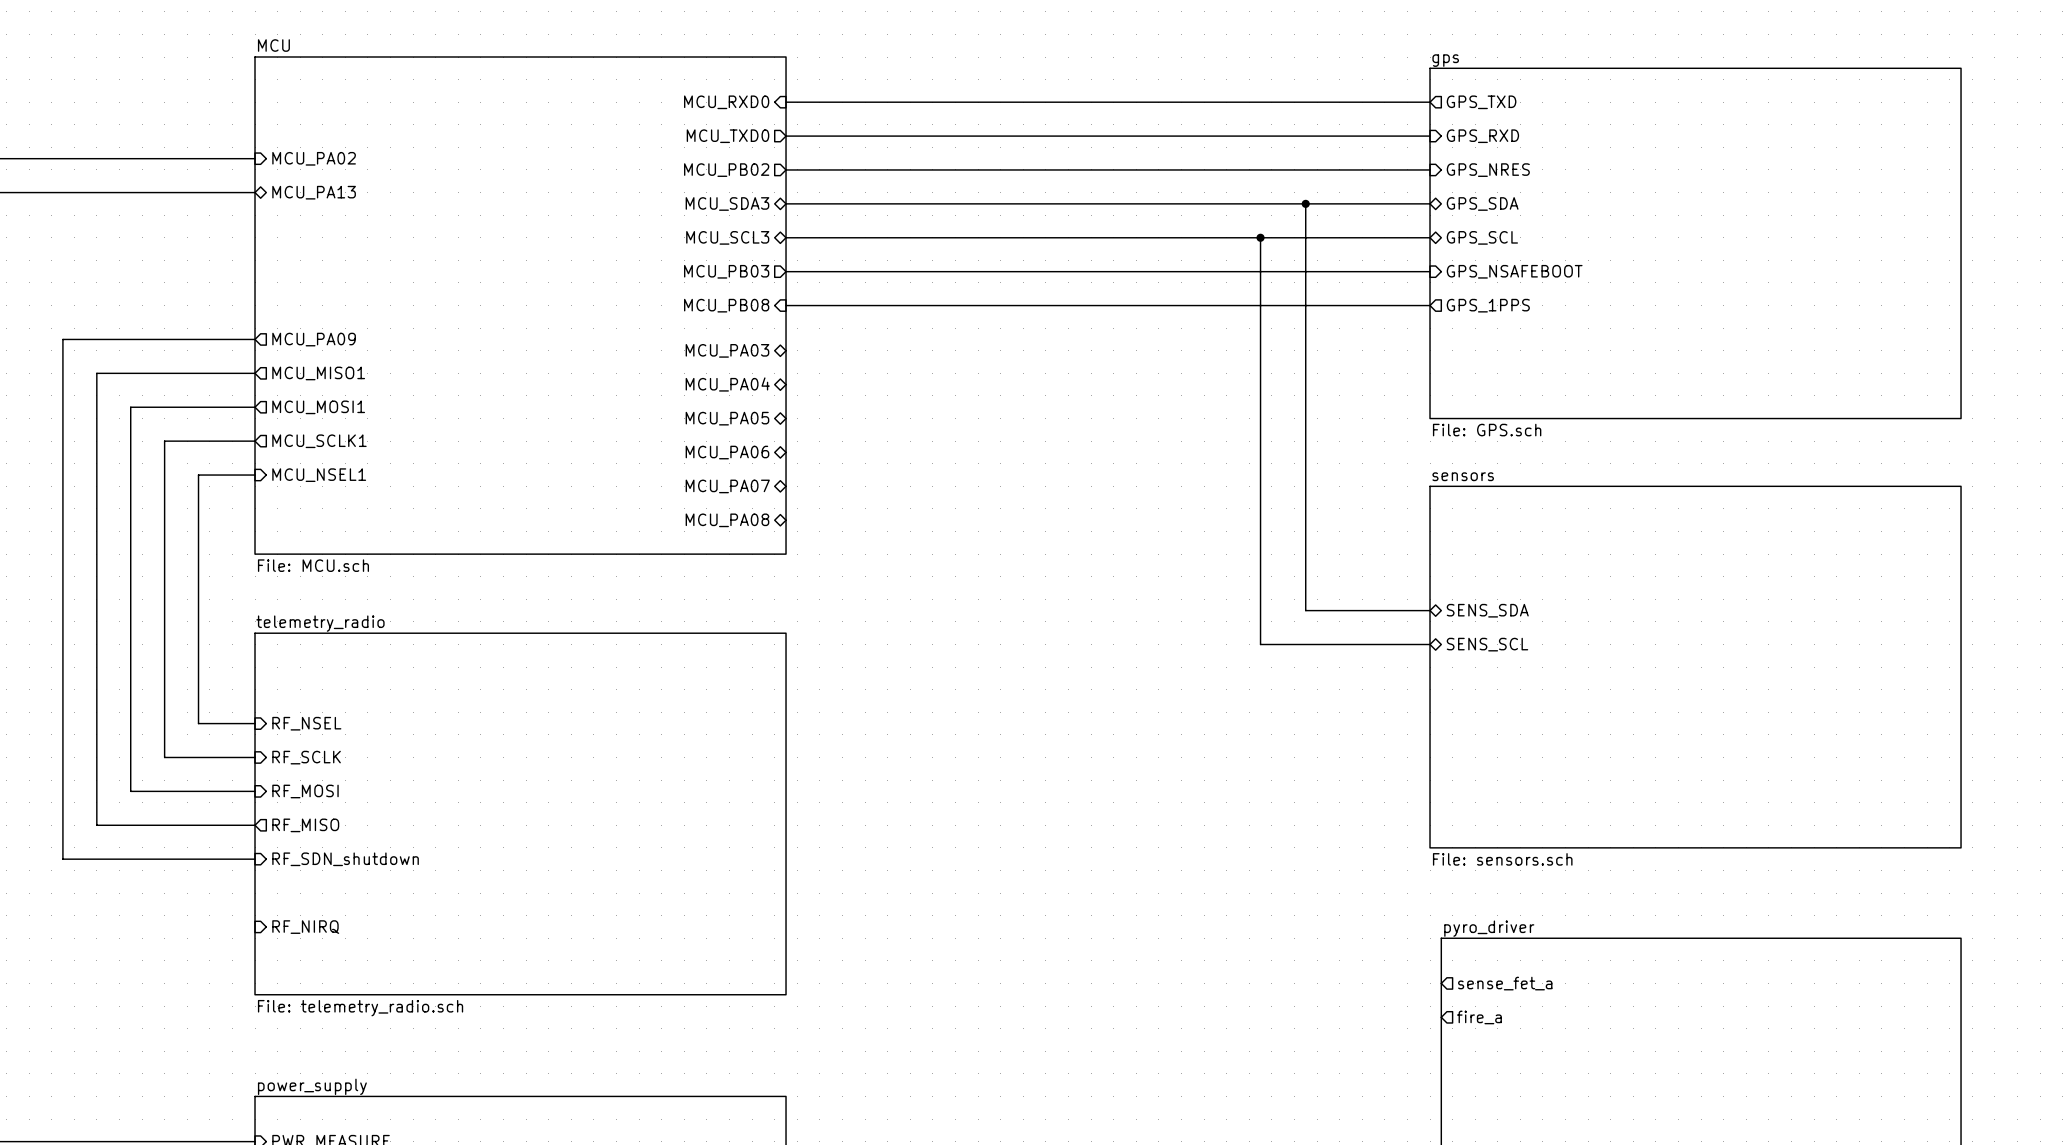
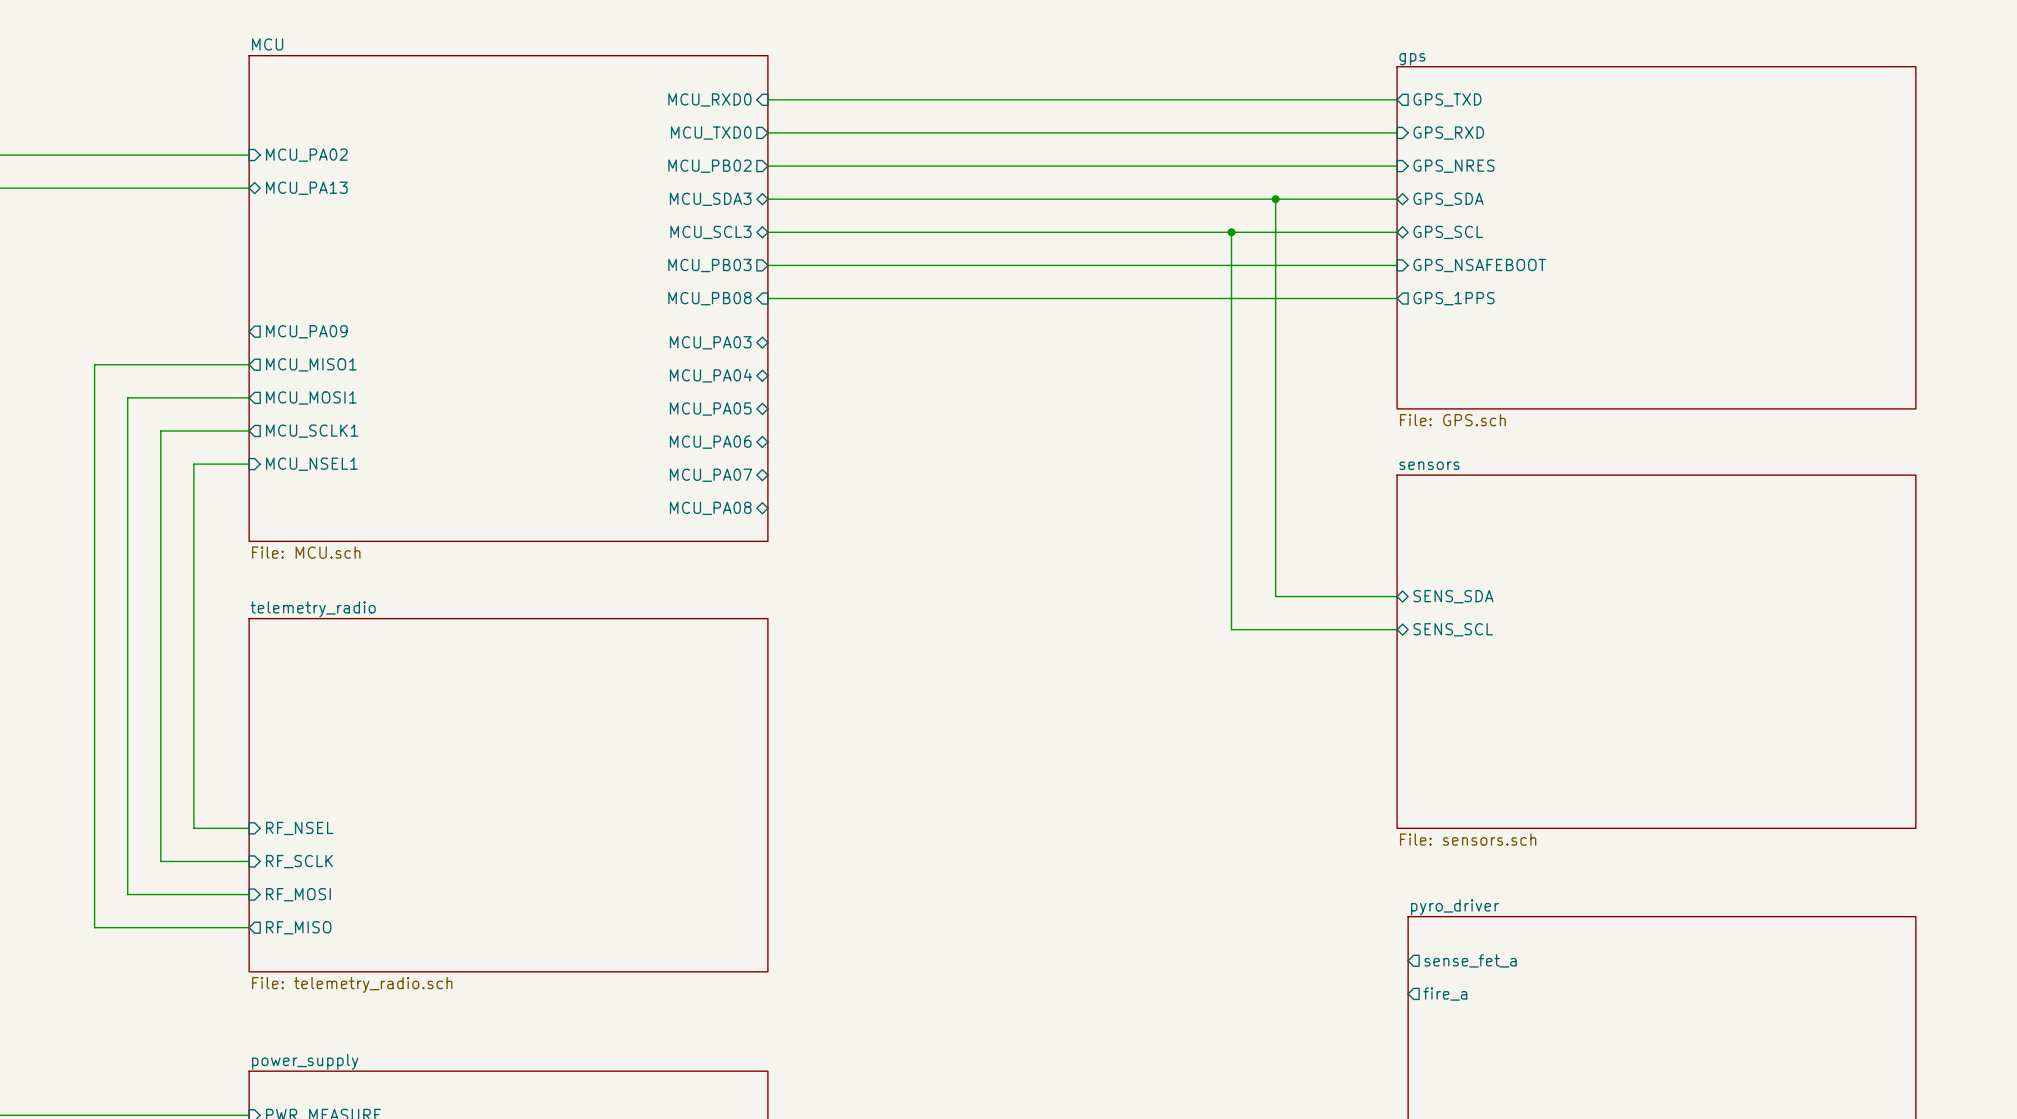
wire: (255, 339) (62, 339) (62, 859) (255, 859) -> none
wire: (198, 723) (255, 723) -> (193, 706) (193, 828) (249, 828)
sheet pin position: RF_NSEL (306, 723) -> RF_NSEL (299, 828)
wire: (164, 757) (255, 757) -> (160, 740) (160, 861) (249, 861)
sheet pin position: RF_SCLK (306, 757) -> RF_SCLK (299, 861)
wire: (130, 791) (255, 791) -> (127, 773) (127, 894) (249, 894)
sheet pin position: RF_MOSI (305, 791) -> RF_MOSI (298, 894)
wire: (96, 825) (255, 825) -> (94, 806) (94, 927) (249, 927)
sheet pin position: RF_MISO (305, 825) -> RF_MISO (298, 927)
sheet pin: RF_SDN_shutdown (345, 859) -> none
sheet pin: RF_NIRQ (305, 927) -> none

